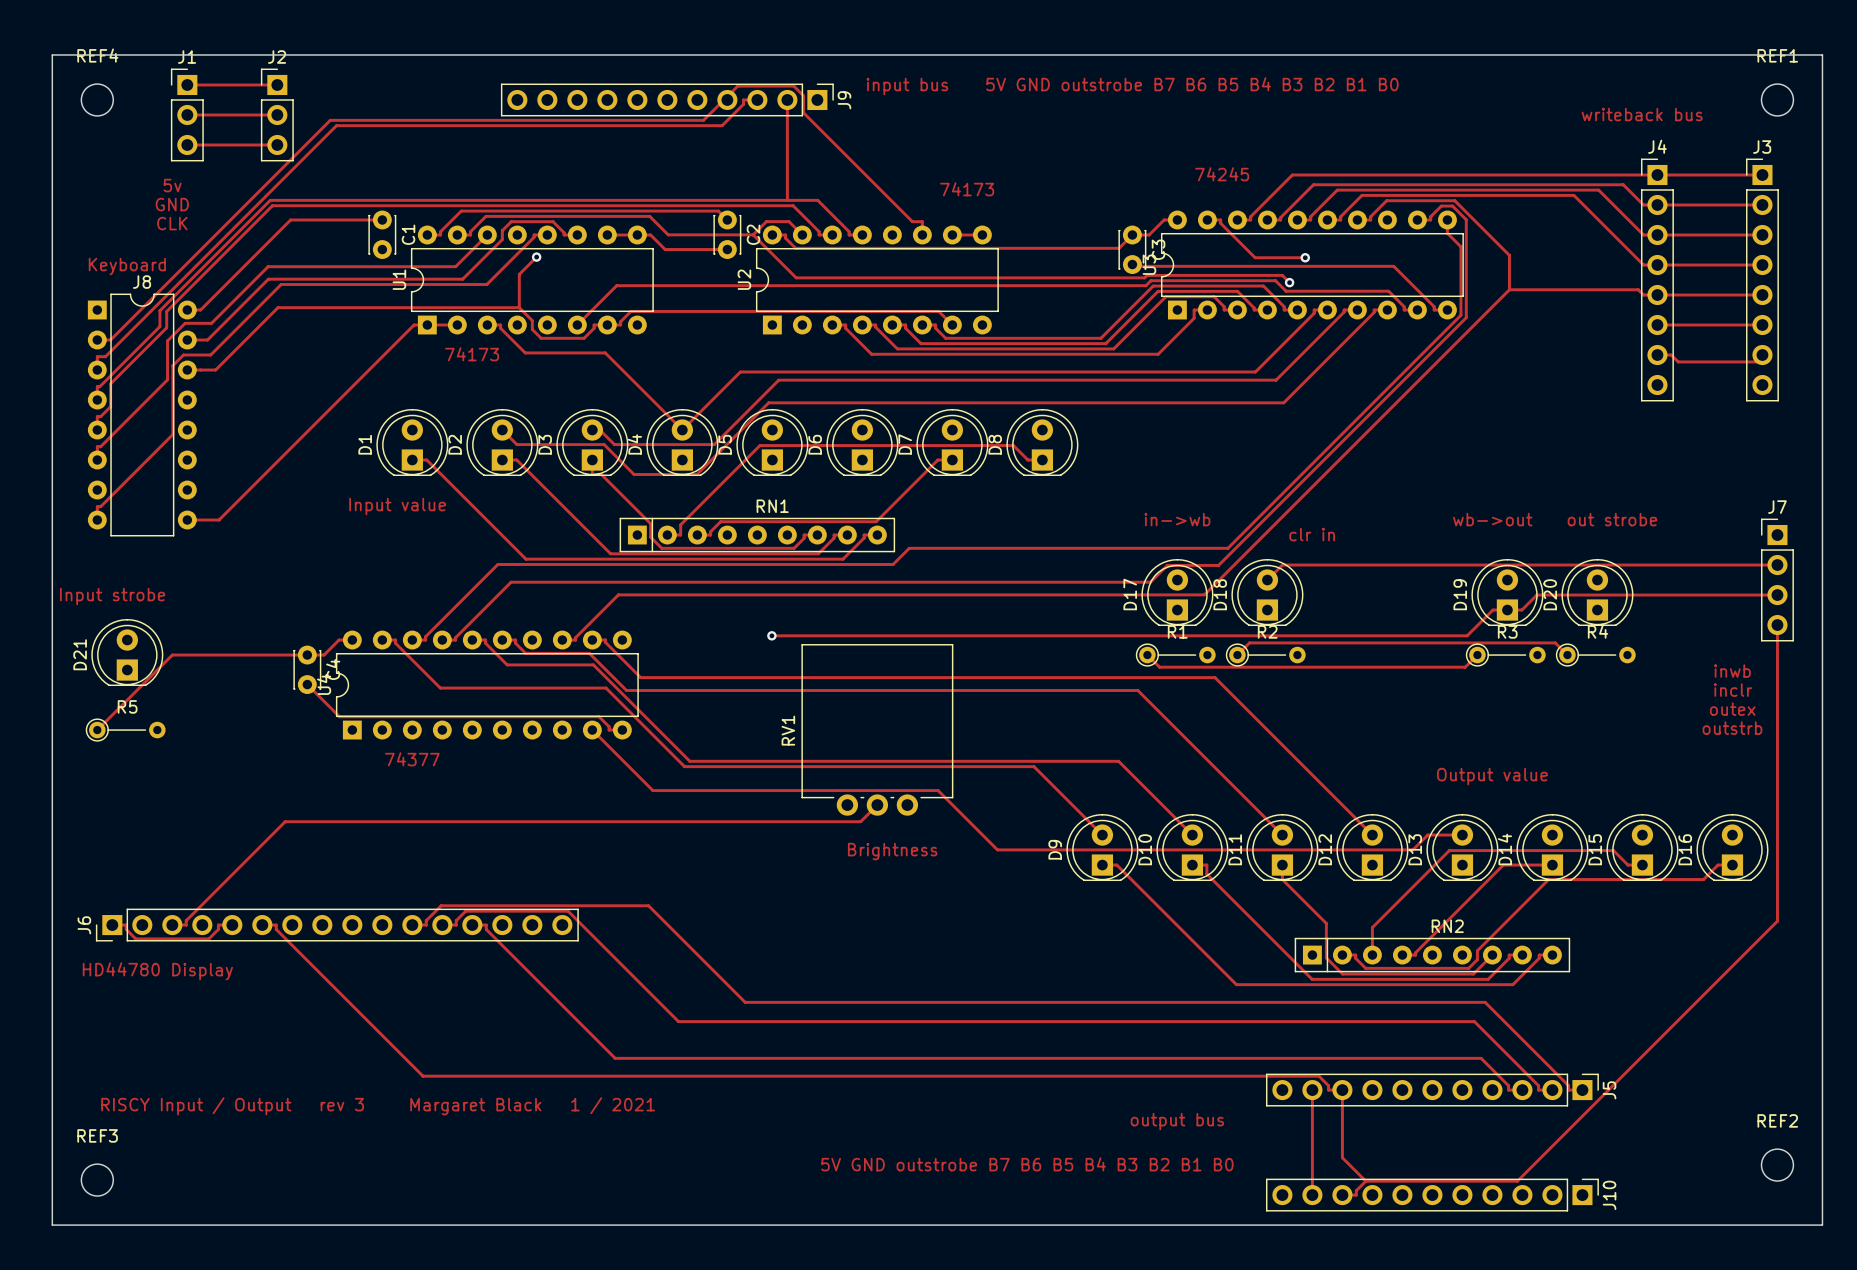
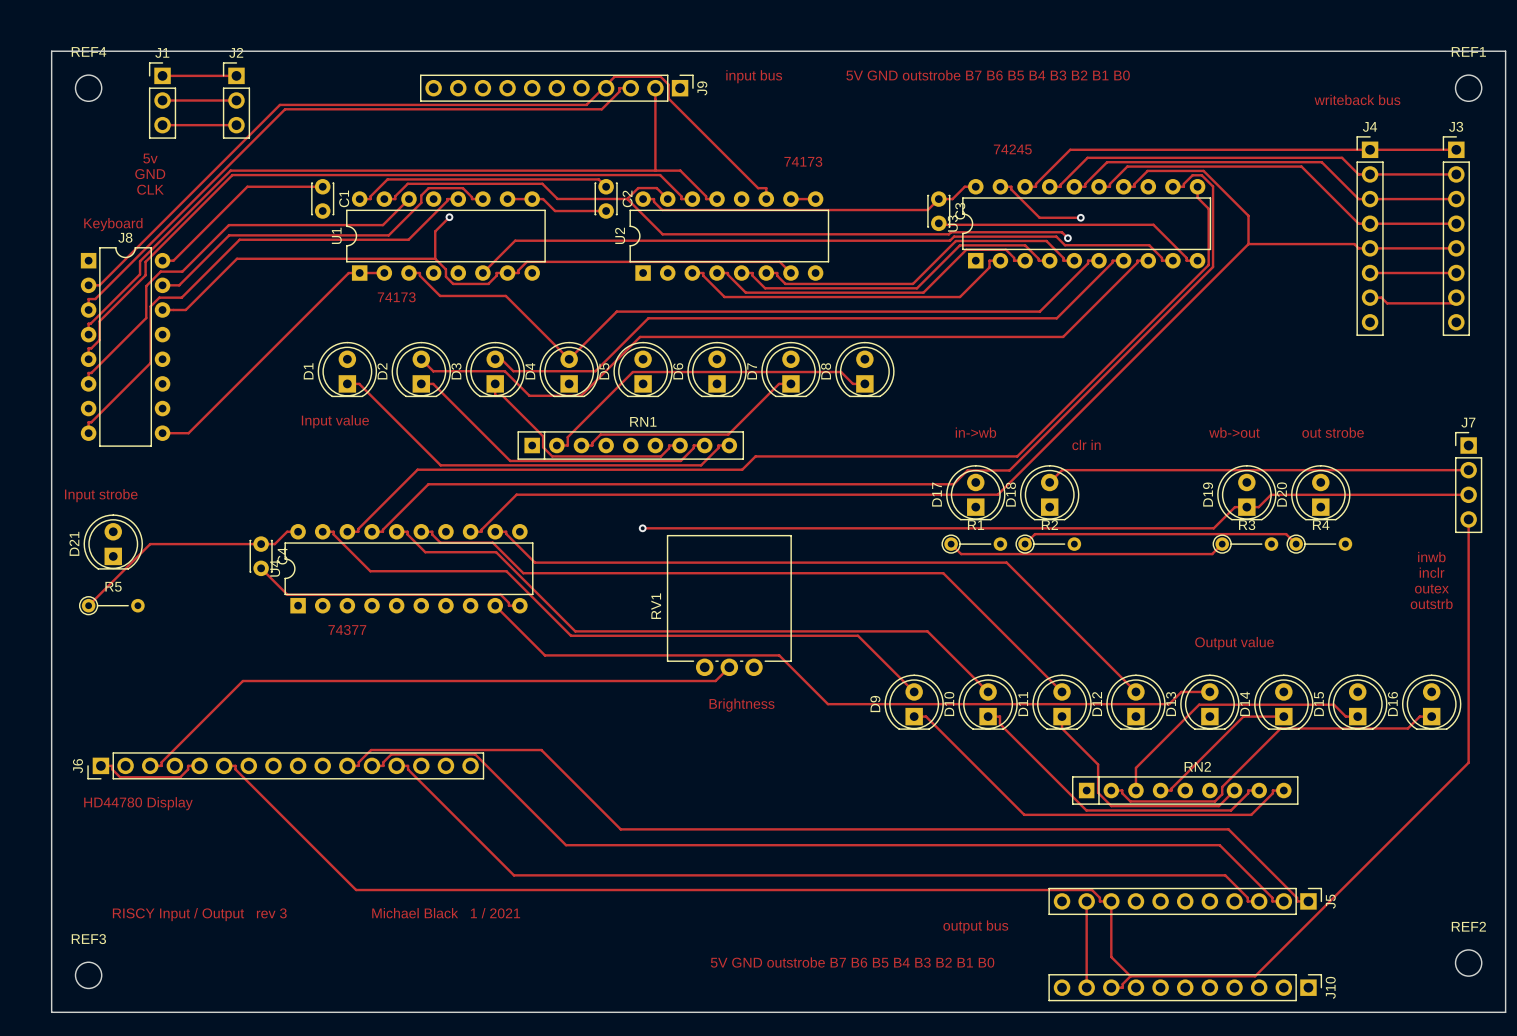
text: Margaret Black 1 / 2021 (532, 1106) -> Michael Black 1 / 2021 (446, 913)

